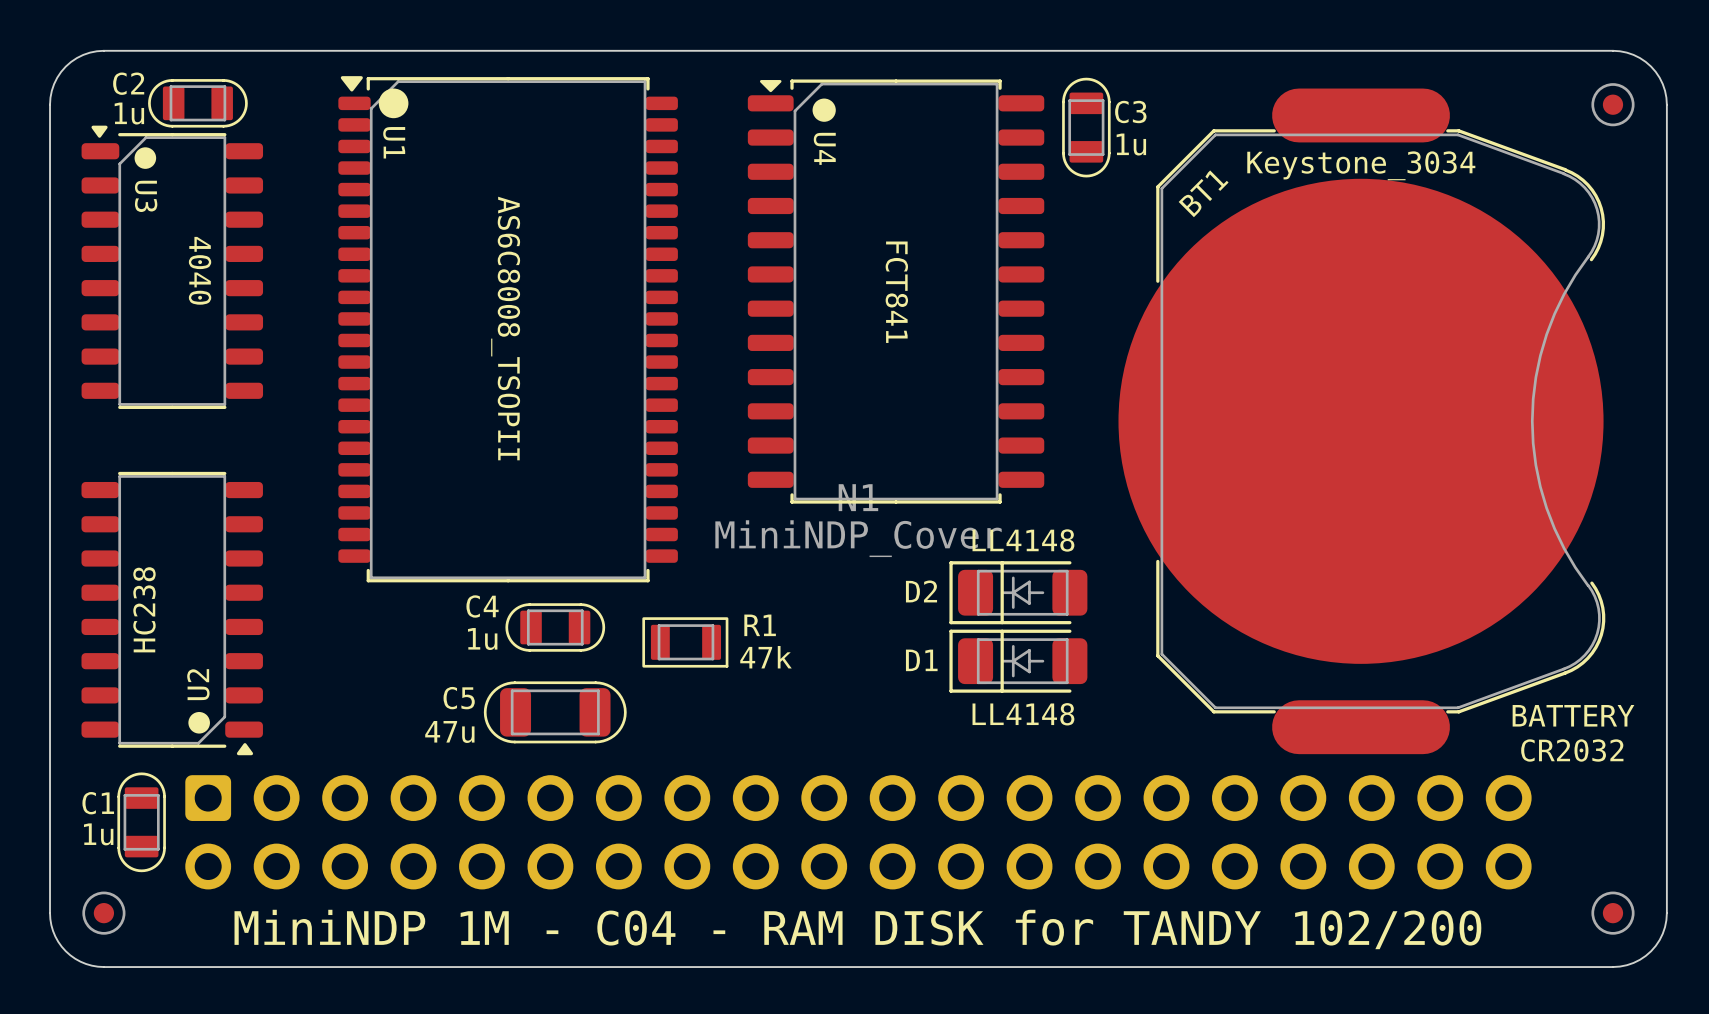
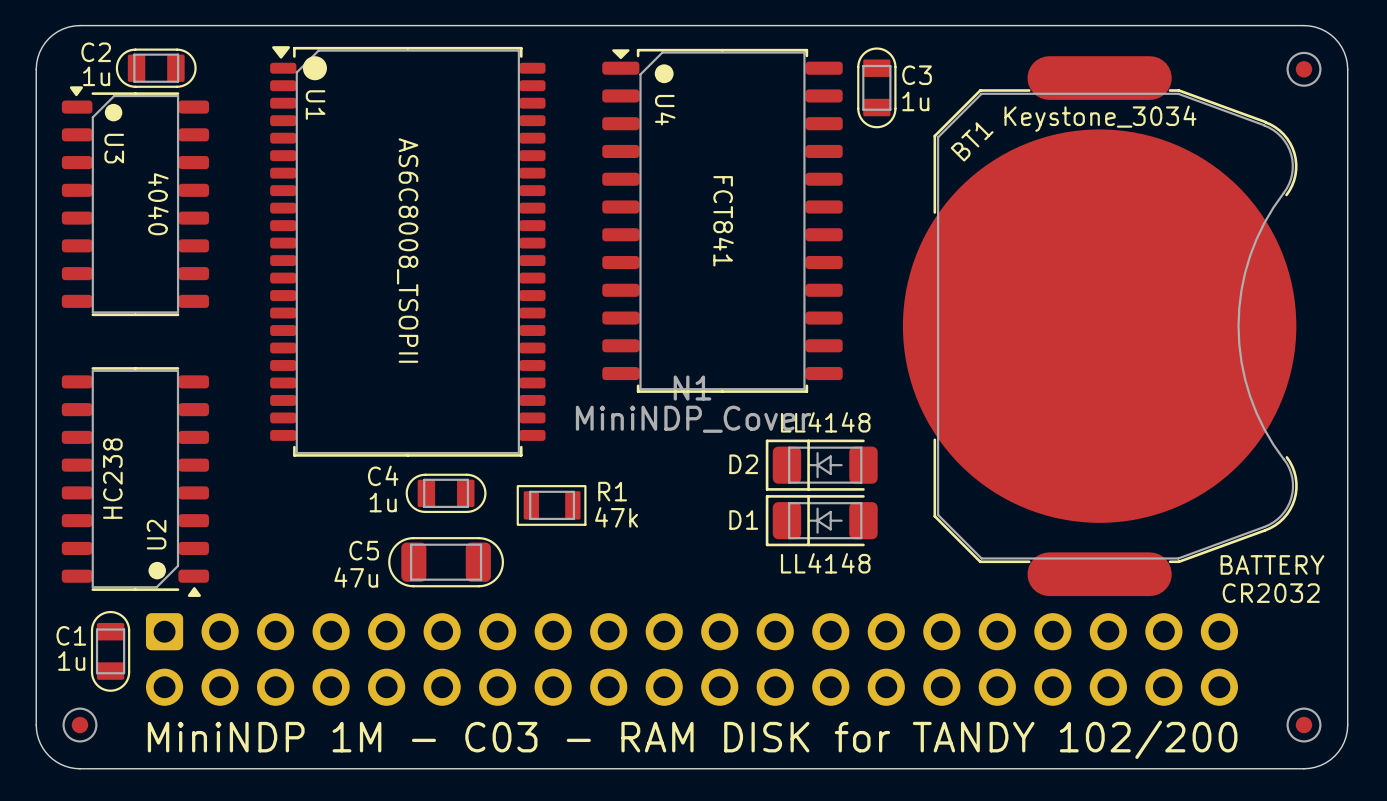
text: MiniNDP 1M - C04 - RAM DISK for TANDY 102/200 (857, 929) -> MiniNDP 1M - C03 - RAM DISK for TANDY 102/200 (692, 739)

